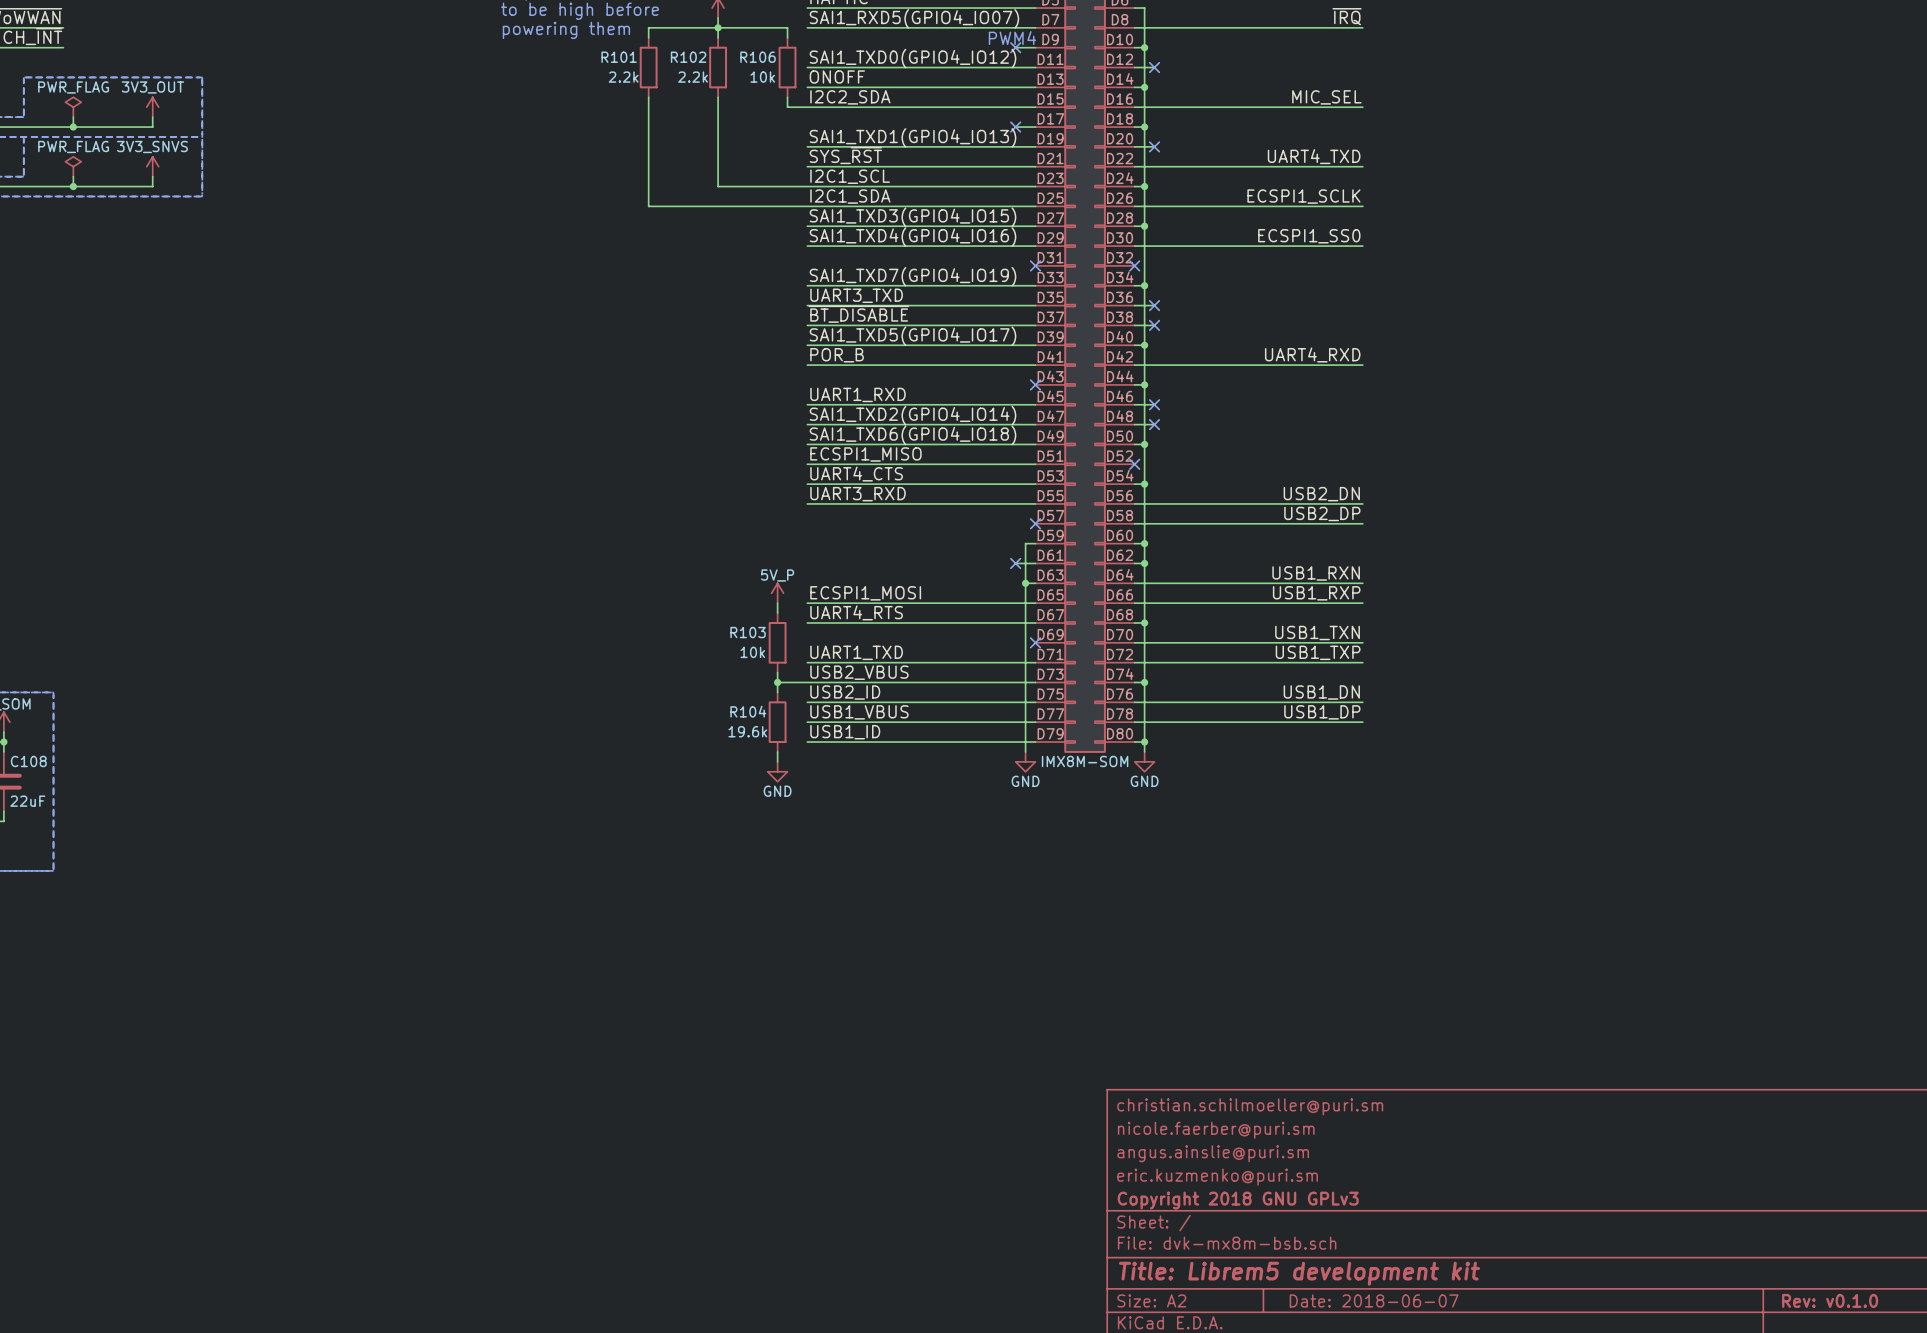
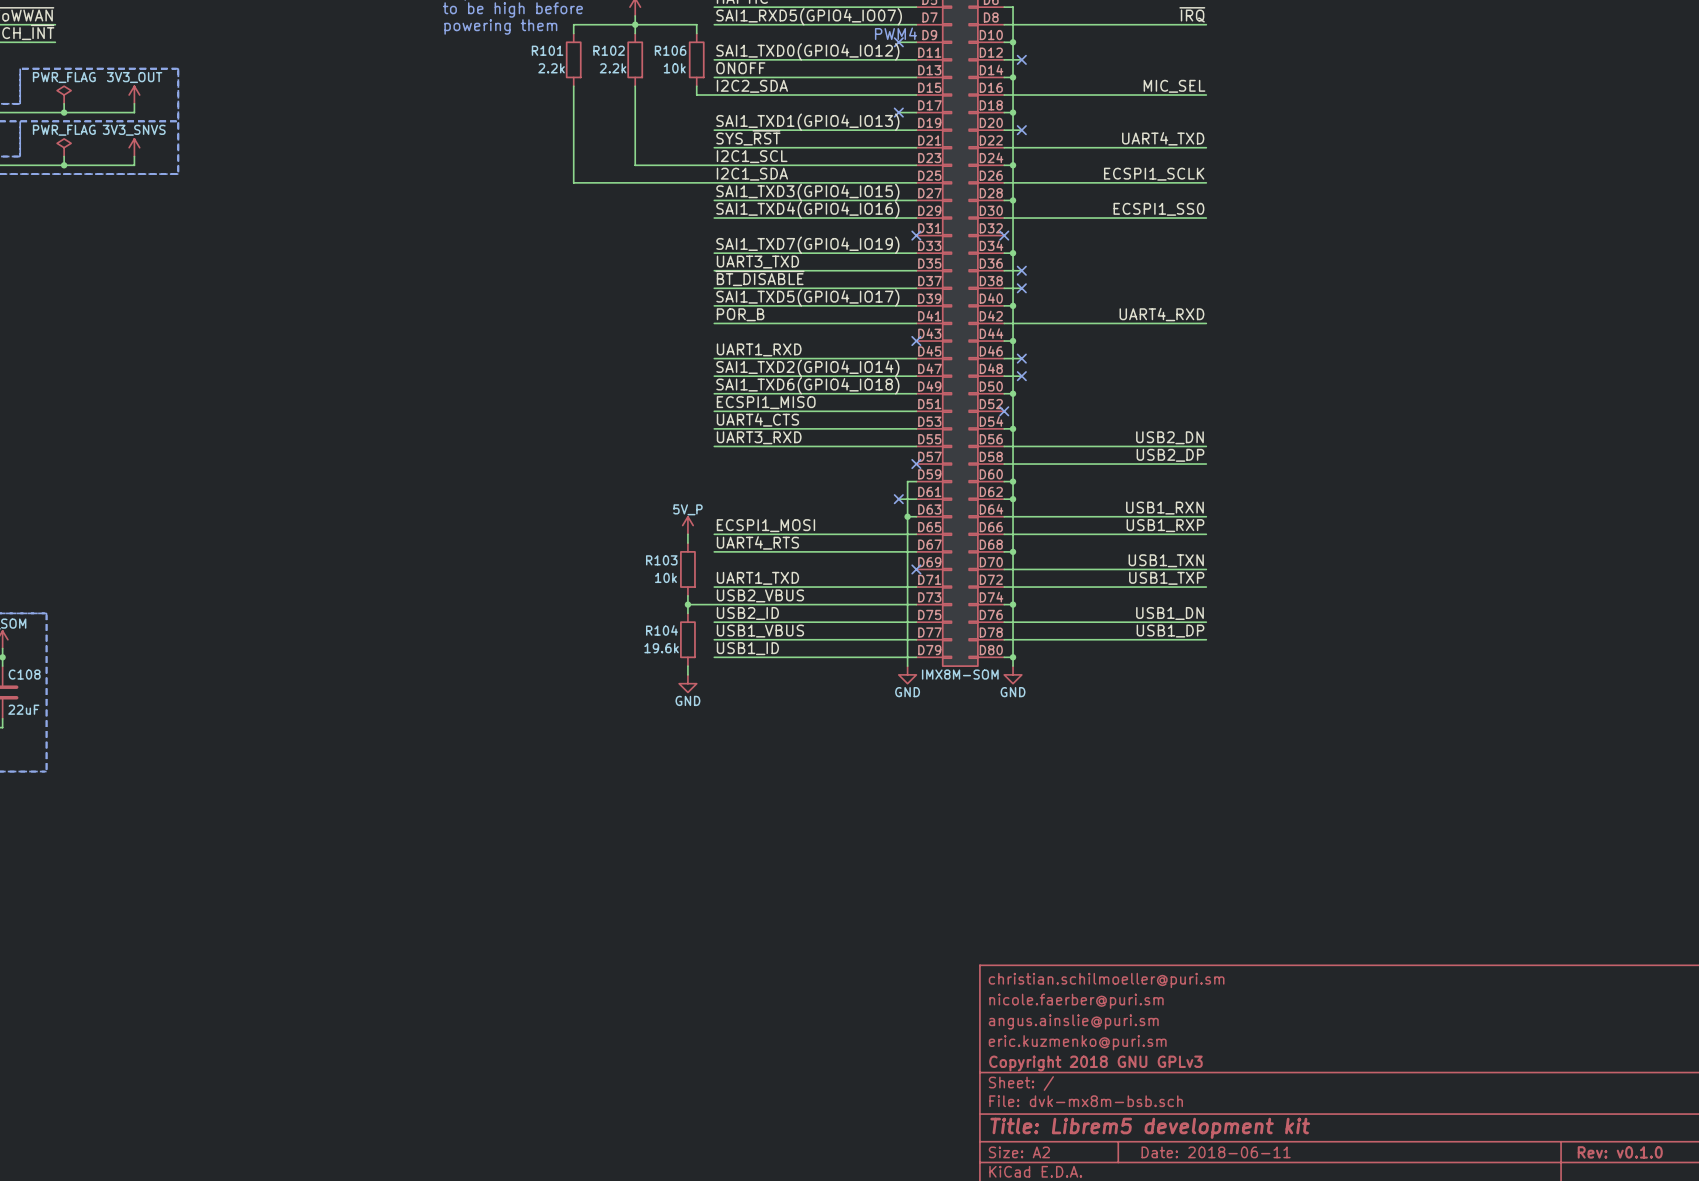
title block: Date: 2018-06-07 (1374, 1300) -> Date: 2018-06-11 (1216, 1152)

